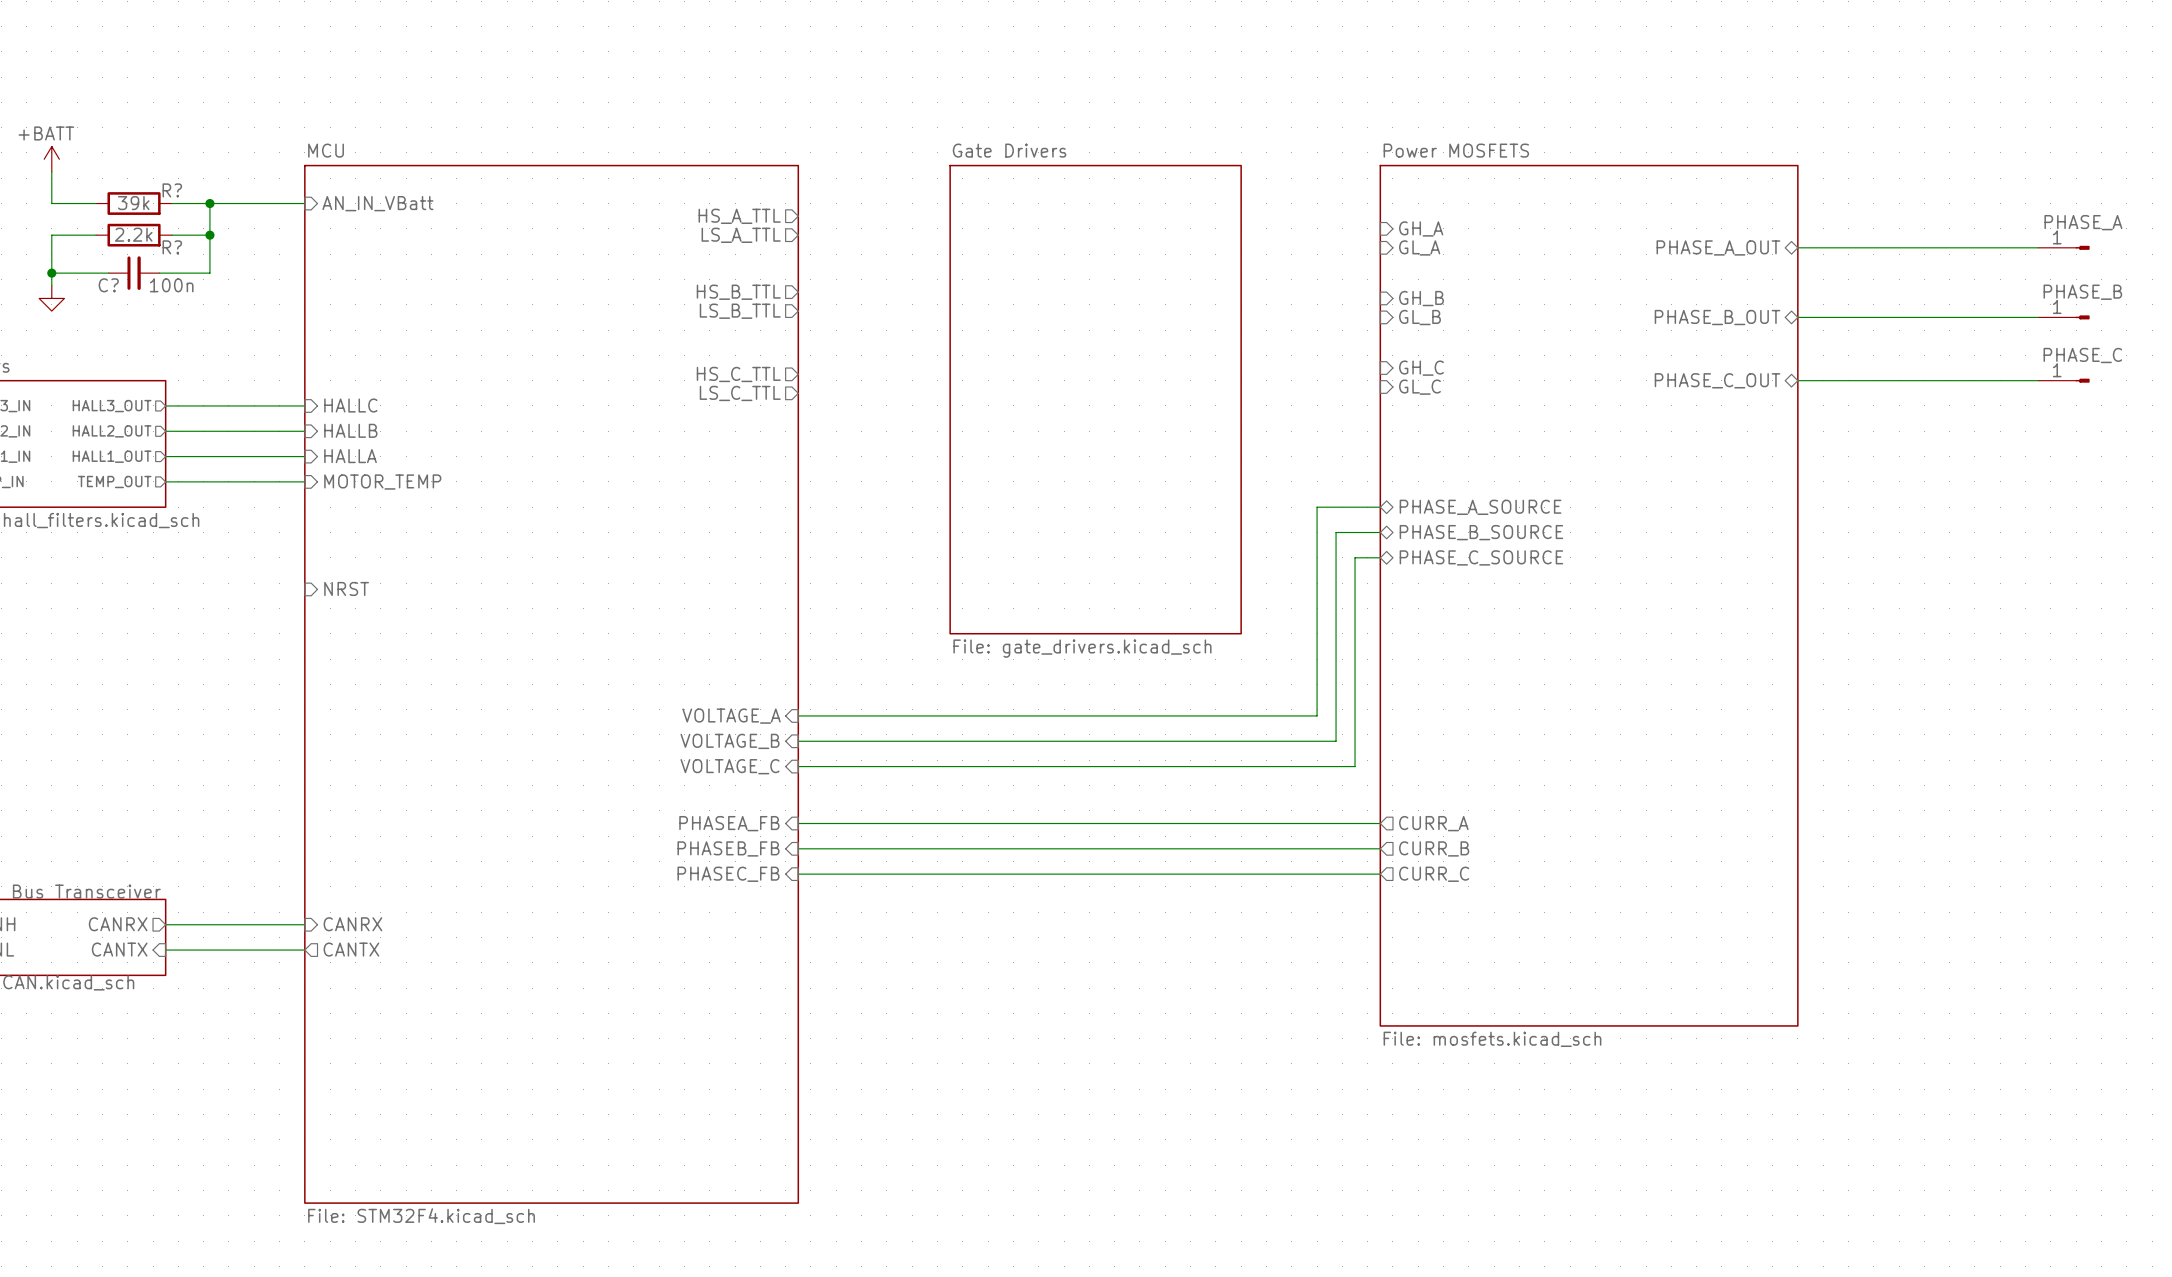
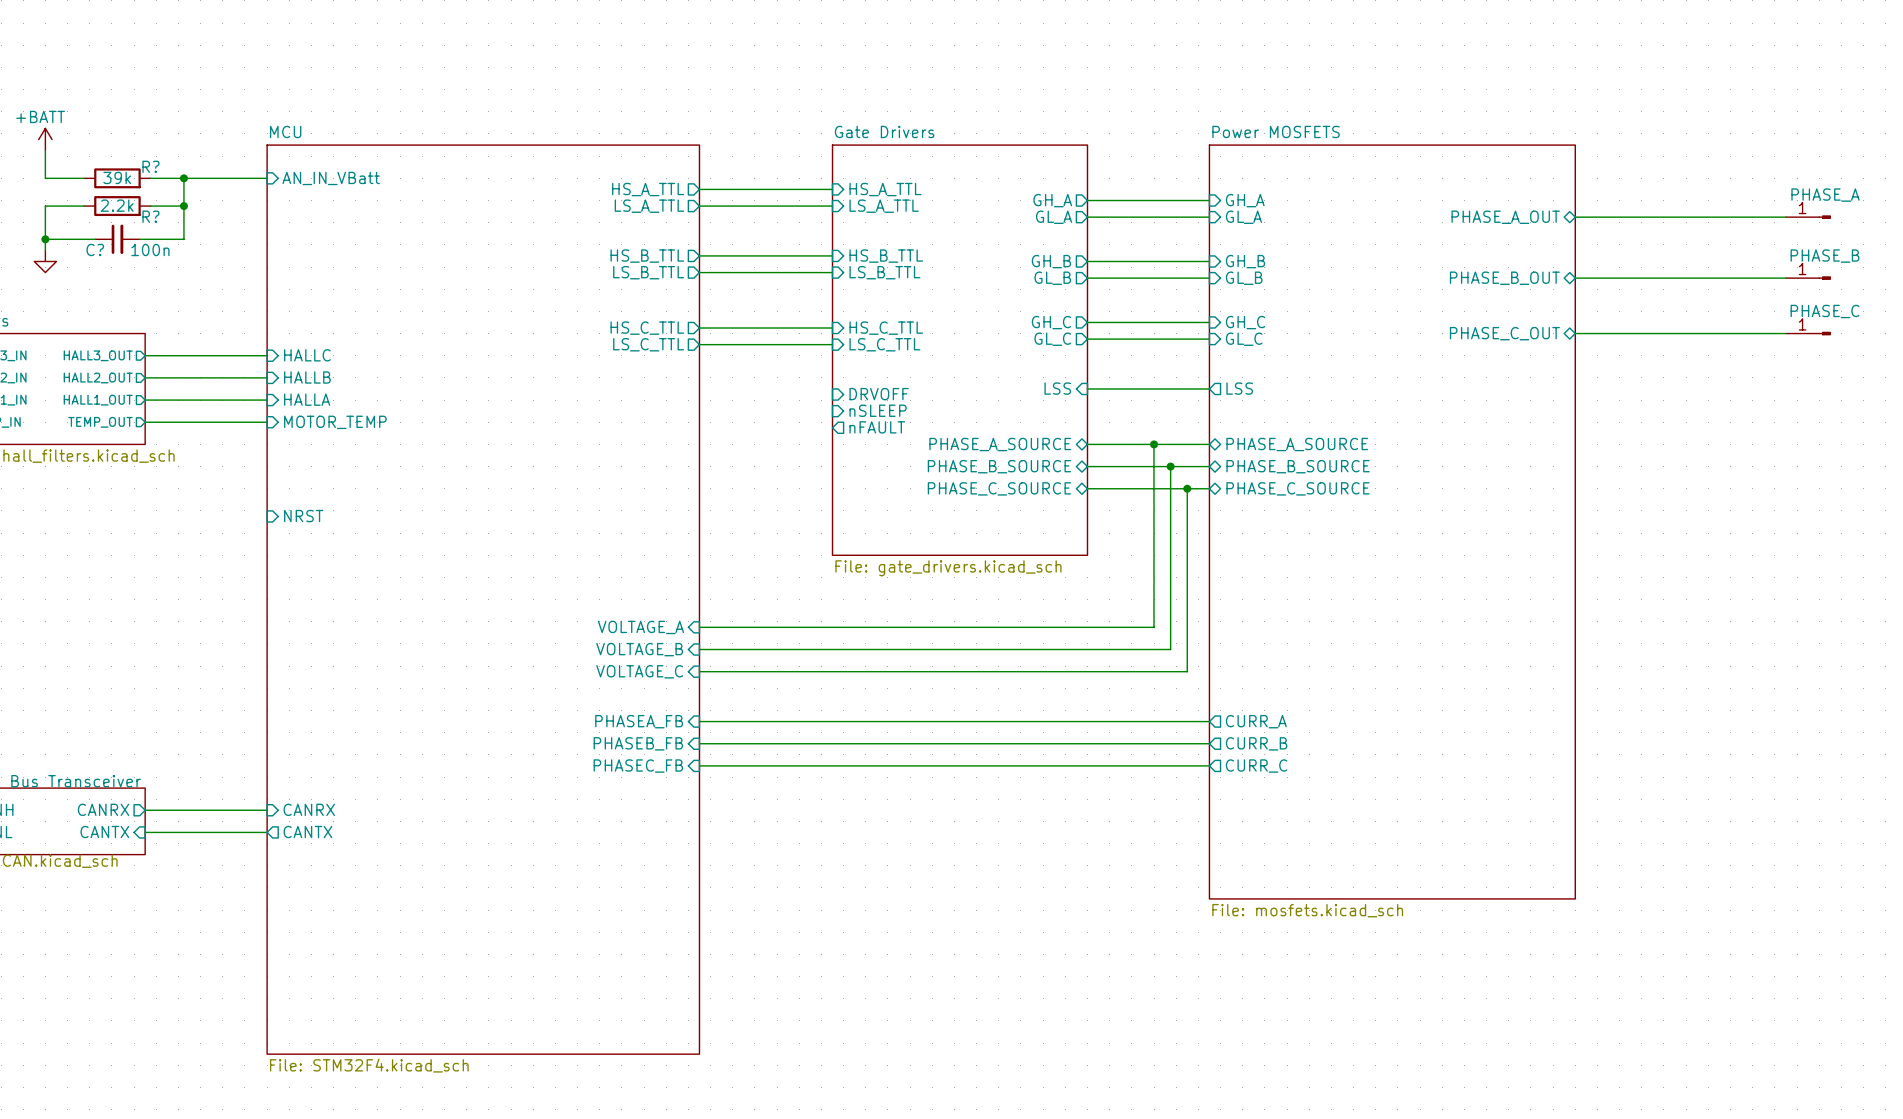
wire: none -> (699, 189) (832, 189)
sheet pin: none -> HS_A_TTL (885, 189)
sheet pin: none -> GH_A (1052, 200)
wire: none -> (1087, 200) (1209, 200)
wire: none -> (699, 206) (832, 206)
sheet pin: none -> LS_A_TTL (884, 206)
sheet pin: none -> GL_A (1054, 217)
wire: none -> (1087, 217) (1209, 217)
wire: none -> (699, 255) (832, 255)
sheet pin: none -> HS_B_TTL (886, 256)
sheet pin: none -> GH_B (1051, 261)
wire: none -> (1087, 261) (1209, 261)
wire: none -> (699, 272) (832, 272)
sheet pin: none -> LS_B_TTL (884, 272)
sheet pin: none -> GL_B (1052, 278)
wire: none -> (1087, 278) (1209, 278)
sheet pin: none -> GH_C (1051, 322)
wire: none -> (1087, 322) (1209, 322)
wire: none -> (699, 328) (832, 328)
sheet pin: none -> HS_C_TTL (886, 328)
sheet pin: none -> GL_C (1052, 339)
wire: none -> (1087, 339) (1209, 339)
wire: none -> (699, 344) (832, 344)
sheet pin: none -> LS_C_TTL (884, 344)
sheet pin: none -> LSS (1057, 388)
wire: none -> (1087, 388) (1209, 388)
sheet pin: none -> LSS (1239, 388)
sheet pin: none -> DRVOFF (879, 394)
sheet pin: none -> nSLEEP (878, 410)
sheet pin: none -> nFAULT (877, 427)
sheet pin: none -> PHASE_A_SOURCE (1000, 444)
wire: none -> (1087, 444) (1154, 444)
junction: none -> (1154, 444)
sheet pin: none -> PHASE_B_SOURCE (999, 466)
wire: none -> (1087, 466) (1170, 466)
junction: none -> (1170, 466)
sheet pin: none -> PHASE_C_SOURCE (999, 488)
wire: none -> (1087, 488) (1187, 488)
junction: none -> (1187, 488)

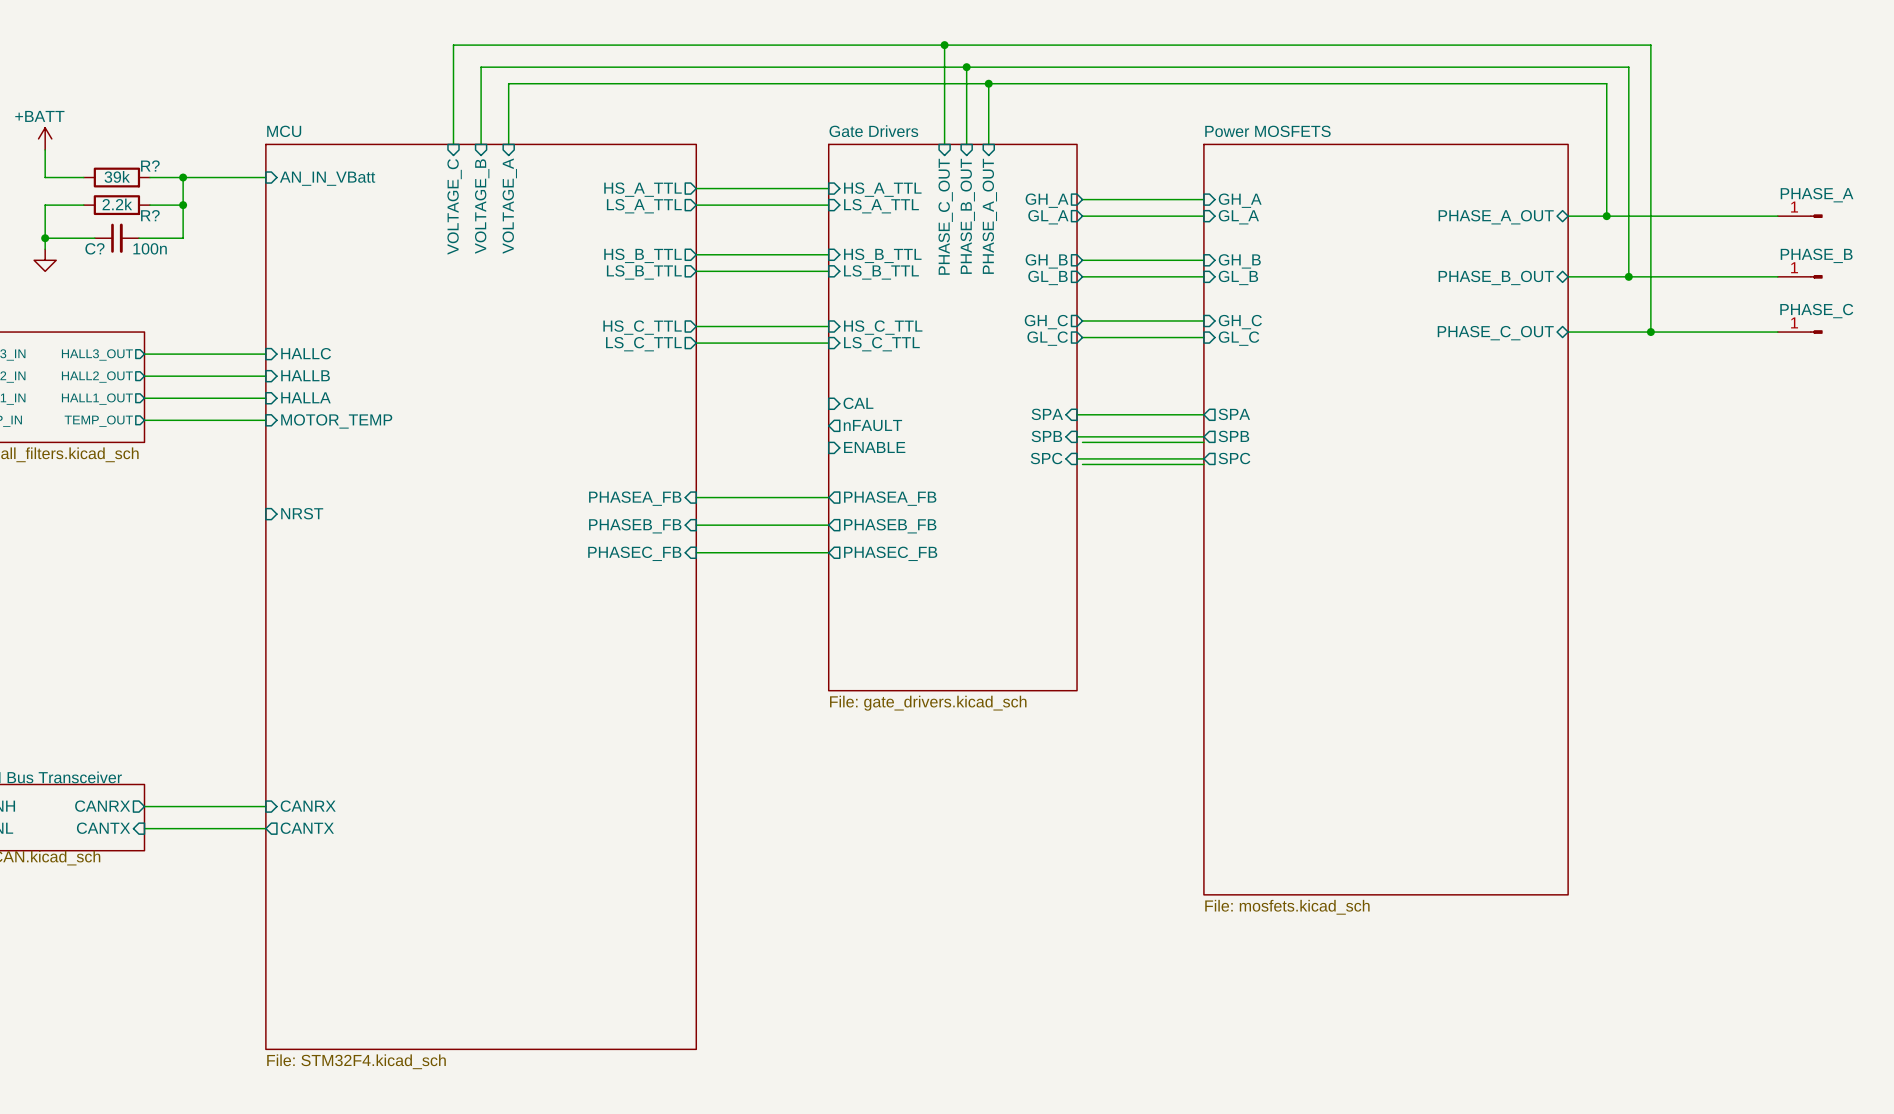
wire: none -> (944, 45) (944, 144)
junction: none -> (944, 45)
wire: none -> (966, 67) (966, 144)
junction: none -> (966, 67)
wire: none -> (988, 83) (988, 144)
junction: none -> (988, 83)
wire: none -> (453, 144) (453, 45) (1650, 45) (1650, 332)
wire: none -> (481, 144) (481, 67) (1628, 67) (1628, 276)
wire: none -> (508, 144) (508, 83) (1606, 83) (1606, 216)
sheet pin: none -> VOLTAGE_A (509, 206)
sheet pin: none -> VOLTAGE_C (454, 206)
sheet pin: none -> VOLTAGE_B (482, 206)
sheet pin: none -> PHASE_A_OUT (989, 216)
sheet pin: none -> PHASE_C_OUT (945, 216)
sheet pin: none -> PHASE_B_OUT (967, 216)
junction: none -> (1606, 216)
junction: none -> (1628, 276)
junction: none -> (1650, 332)
sheet Gate Drivers: File: gate_drivers.kicad_sch (960, 350) -> none
sheet pin: LSS (1057, 388) -> none
wire: (1087, 388) (1209, 388) -> none
sheet pin: LSS (1239, 388) -> none
sheet pin: DRVOFF (879, 394) -> none
sheet pin: none -> CAL (858, 403)
sheet pin: nSLEEP (878, 410) -> none
sheet pin: none -> SPA (1047, 414)
wire: none -> (1077, 414) (1203, 414)
sheet pin: none -> SPA (1234, 414)
sheet Gate Drivers: none -> File: gate_drivers.kicad_sch (952, 417)
wire: none -> (1077, 436) (1203, 436)
sheet pin shape: bidirectional (1000, 444) -> input (1046, 436)
sheet pin: PHASE_A_SOURCE (1000, 444) -> SPB (1046, 436)
wire: (1154, 444) (1154, 627) (699, 627) -> none
junction: (1154, 444) -> none
sheet pin shape: bidirectional (1297, 444) -> output (1233, 436)
sheet pin: PHASE_A_SOURCE (1297, 444) -> SPB (1233, 436)
sheet pin: none -> ENABLE (874, 447)
wire: none -> (1077, 458) (1203, 458)
sheet pin shape: bidirectional (999, 466) -> input (1046, 458)
sheet pin: PHASE_B_SOURCE (999, 466) -> SPC (1046, 458)
wire: (1170, 466) (1170, 649) (699, 649) -> none
junction: (1170, 466) -> none
sheet pin shape: bidirectional (1298, 466) -> output (1234, 458)
sheet pin: PHASE_B_SOURCE (1298, 466) -> SPC (1234, 458)
sheet pin: PHASE_C_SOURCE (999, 488) -> none
wire: (1087, 488) (1209, 488) -> none
wire: (1187, 488) (1187, 671) (699, 671) -> none
junction: (1187, 488) -> none
sheet pin: PHASE_C_SOURCE (1298, 488) -> none
sheet pin: none -> PHASEA_FB (635, 498)
wire: none -> (696, 497) (828, 497)
sheet pin: none -> PHASEA_FB (890, 498)
sheet pin: none -> PHASEB_FB (635, 526)
wire: none -> (696, 525) (828, 525)
sheet pin: none -> PHASEB_FB (890, 526)
sheet pin: none -> PHASEC_FB (634, 553)
wire: none -> (696, 552) (828, 552)
sheet pin: none -> PHASEC_FB (890, 553)
sheet pin: VOLTAGE_A (640, 627) -> none
sheet pin: VOLTAGE_B (639, 649) -> none
sheet pin: VOLTAGE_C (639, 671) -> none
sheet pin: PHASEA_FB (639, 721) -> none
wire: (699, 721) (1209, 721) -> none
sheet pin: CURR_A (1256, 721) -> none
sheet pin: PHASEB_FB (638, 743) -> none
wire: (699, 743) (1209, 743) -> none
sheet pin: CURR_B (1256, 743) -> none
wire: (699, 765) (1209, 765) -> none
sheet pin: PHASEC_FB (638, 766) -> none
sheet pin: CURR_C (1256, 766) -> none

